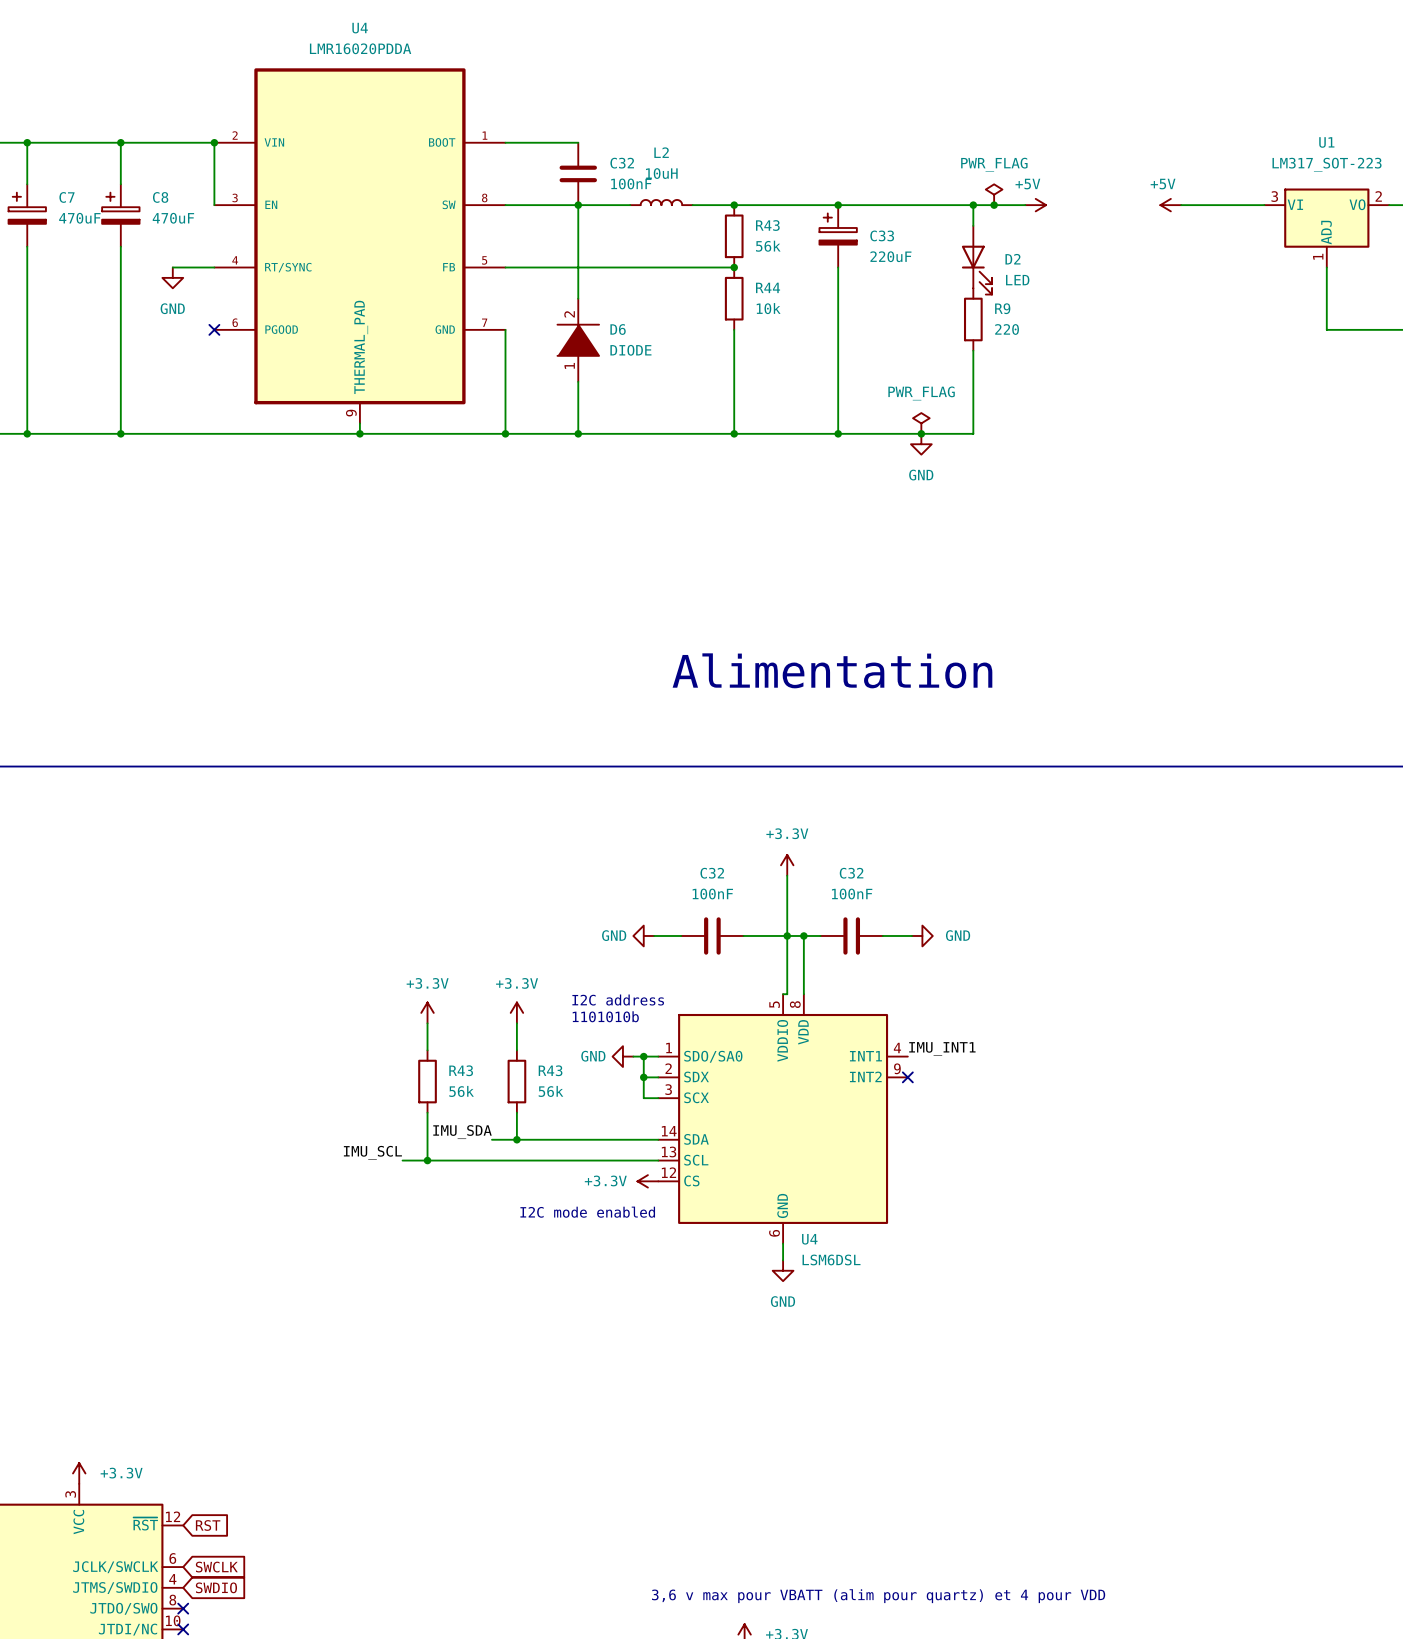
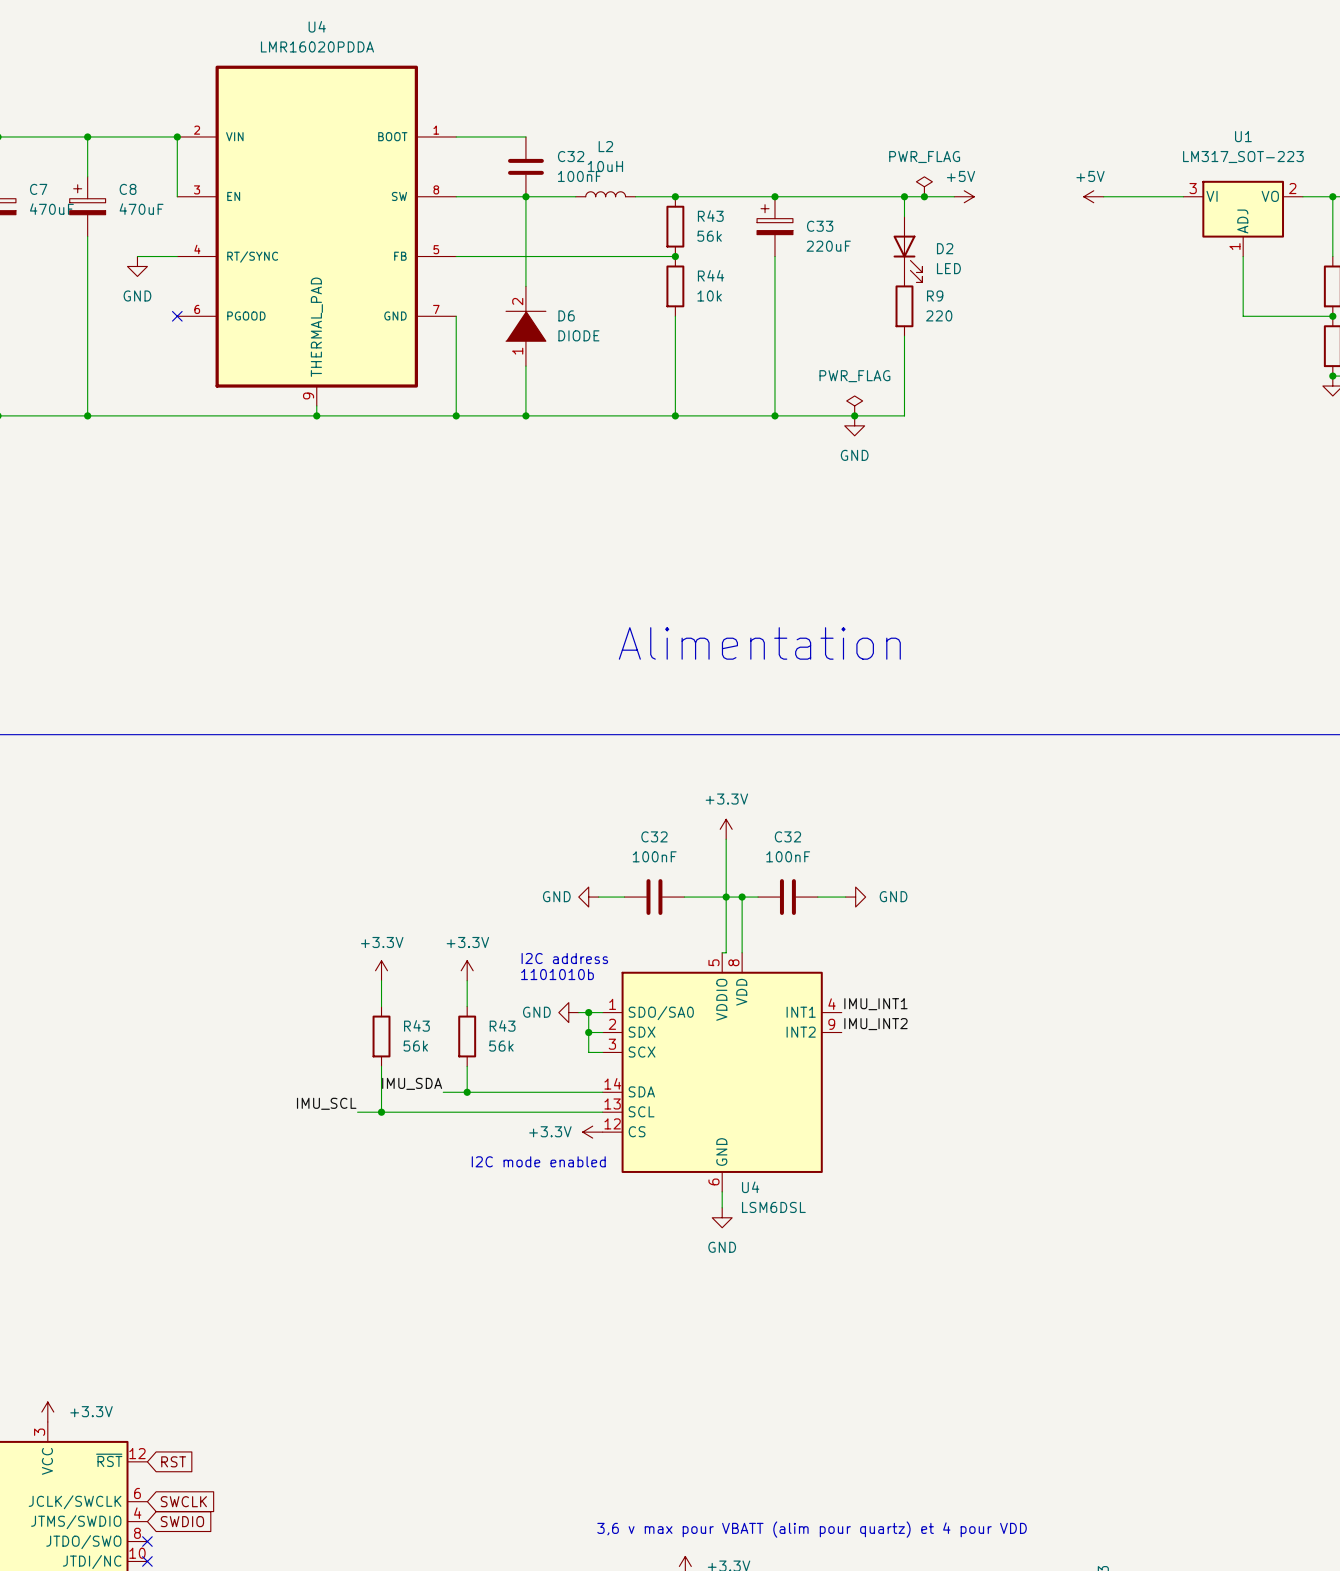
label: none -> IMU_INT2 (875, 1024)
no-connect mark: (907, 1077) -> none

